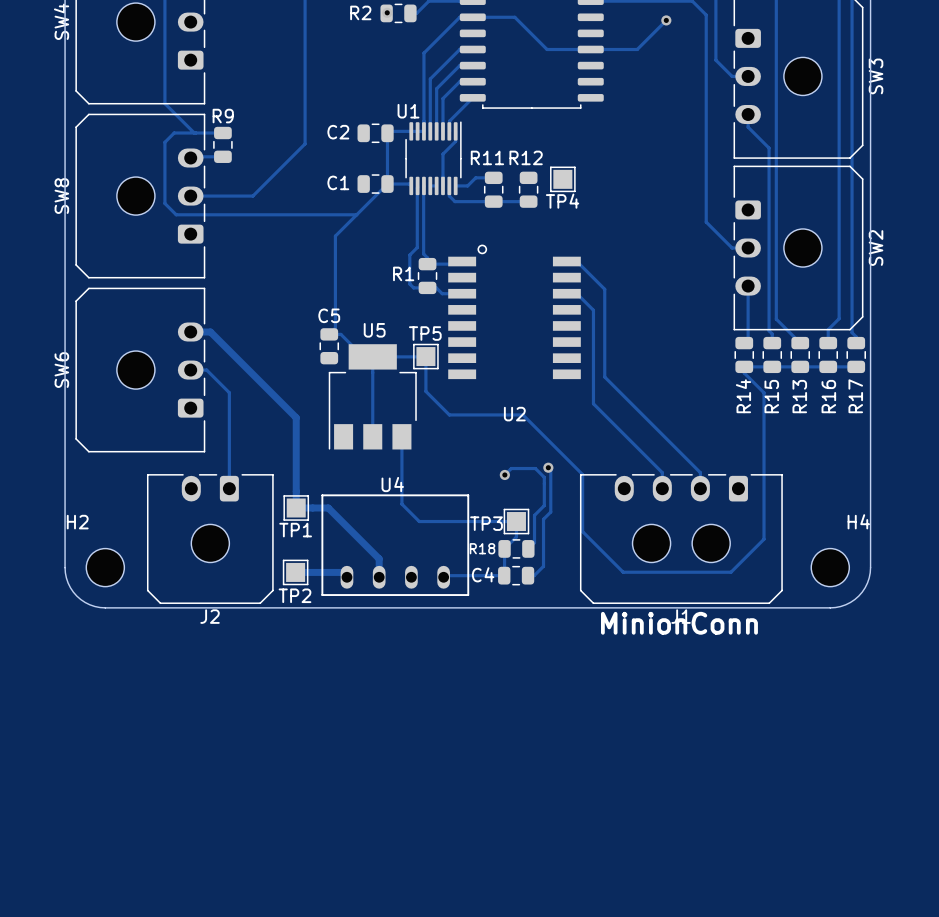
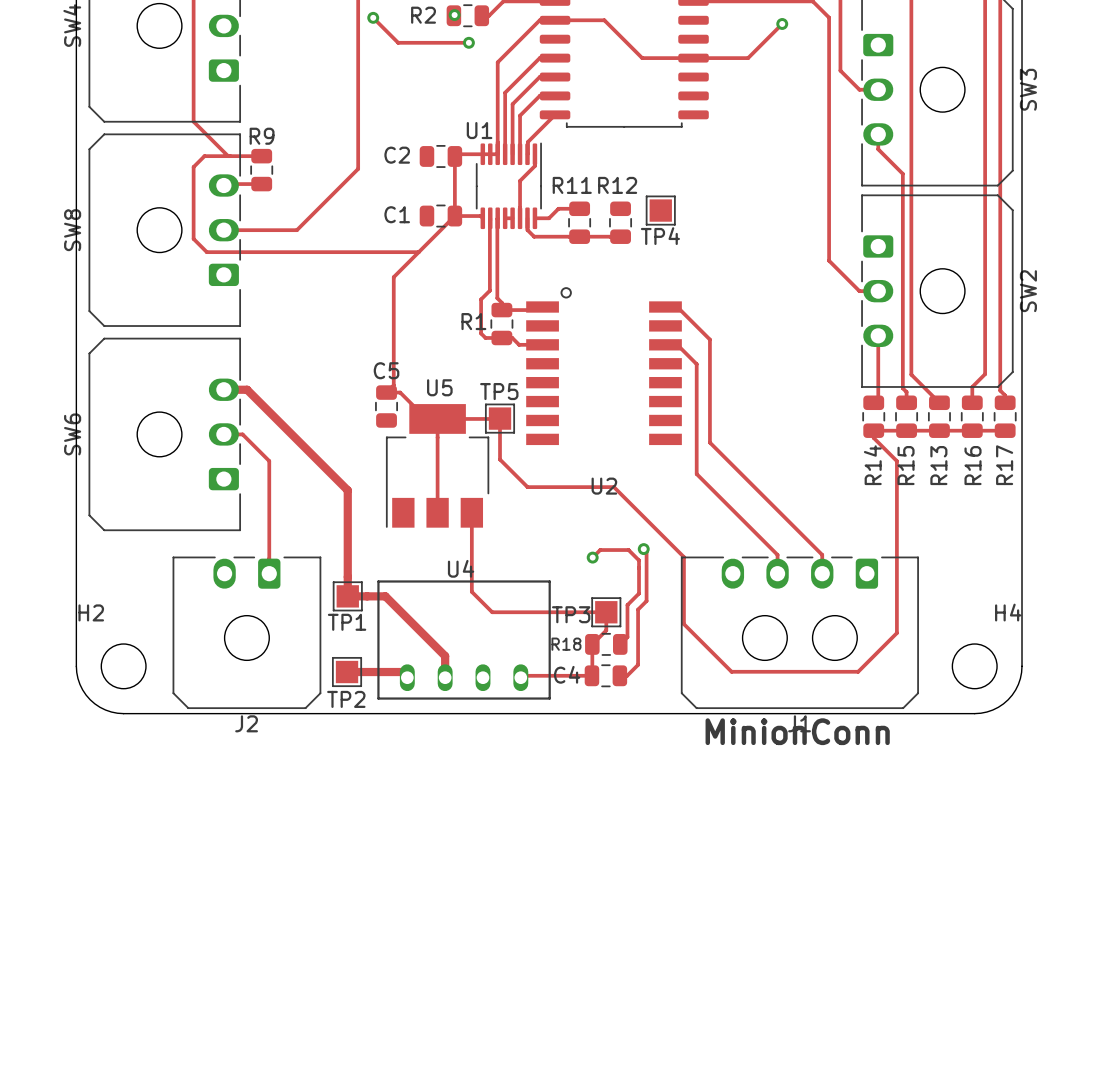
track: none -> (373, 17) (398, 42) (468, 42)
via: none -> (373, 17)
via: none -> (468, 42)

